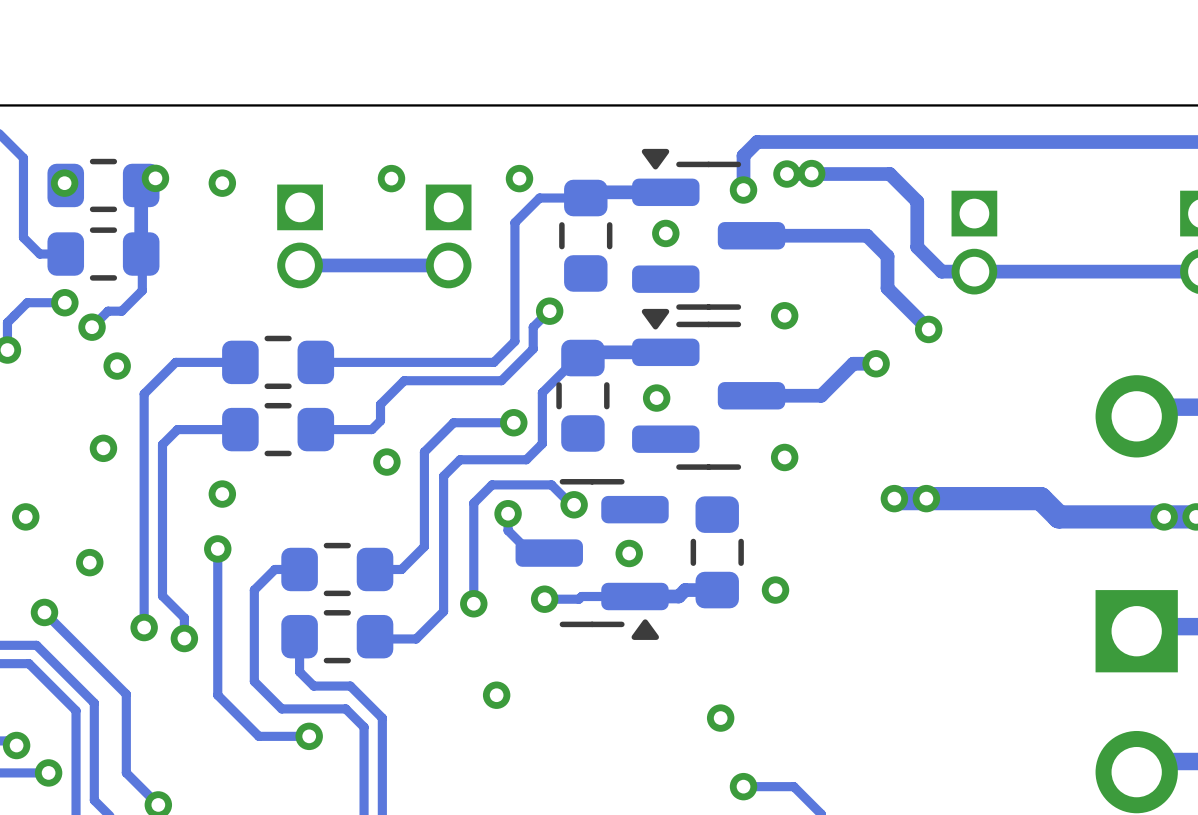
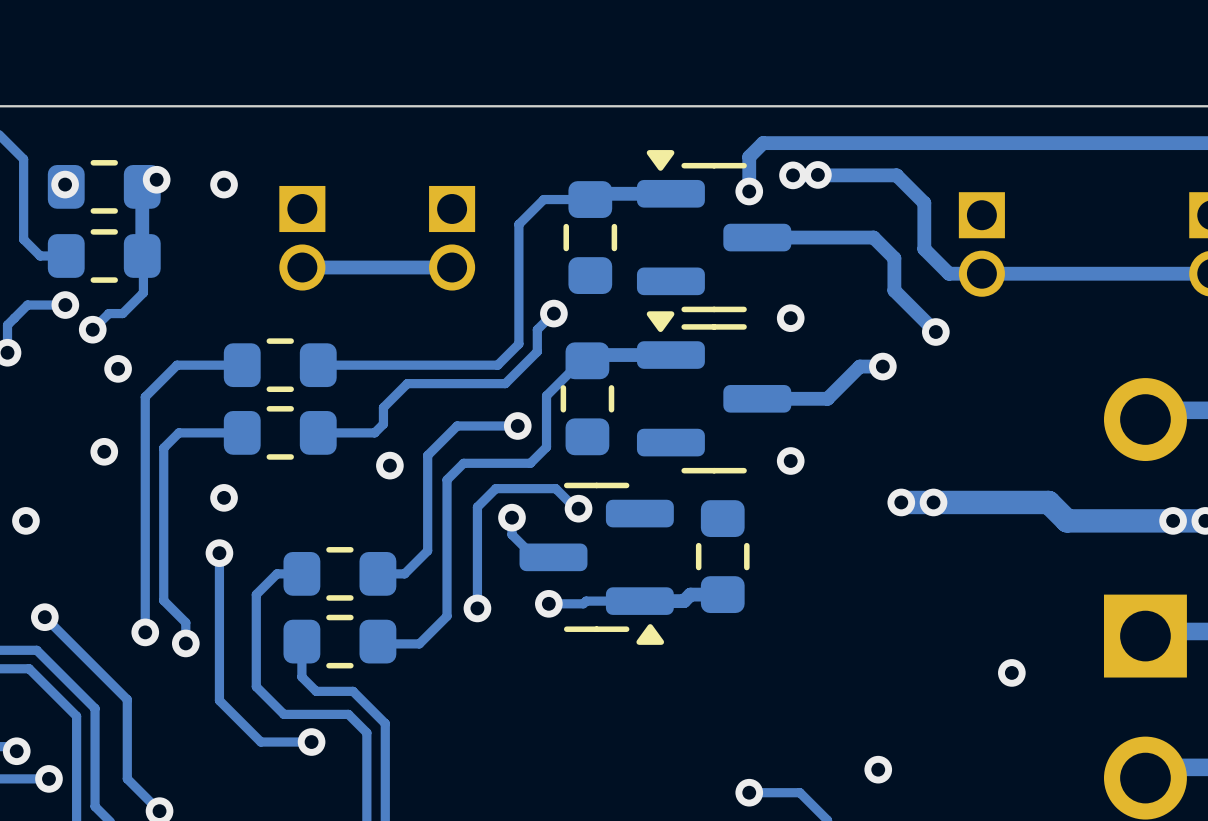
via: (391, 178) -> none
via: (519, 178) -> none
via: (665, 233) -> none
via: (656, 398) -> none
via: (629, 553) -> none
via: (89, 562) -> none
via: (775, 590) -> none
via: none -> (1011, 672)
via: (496, 695) -> none
via: (720, 718) -> none
via: none -> (878, 769)

